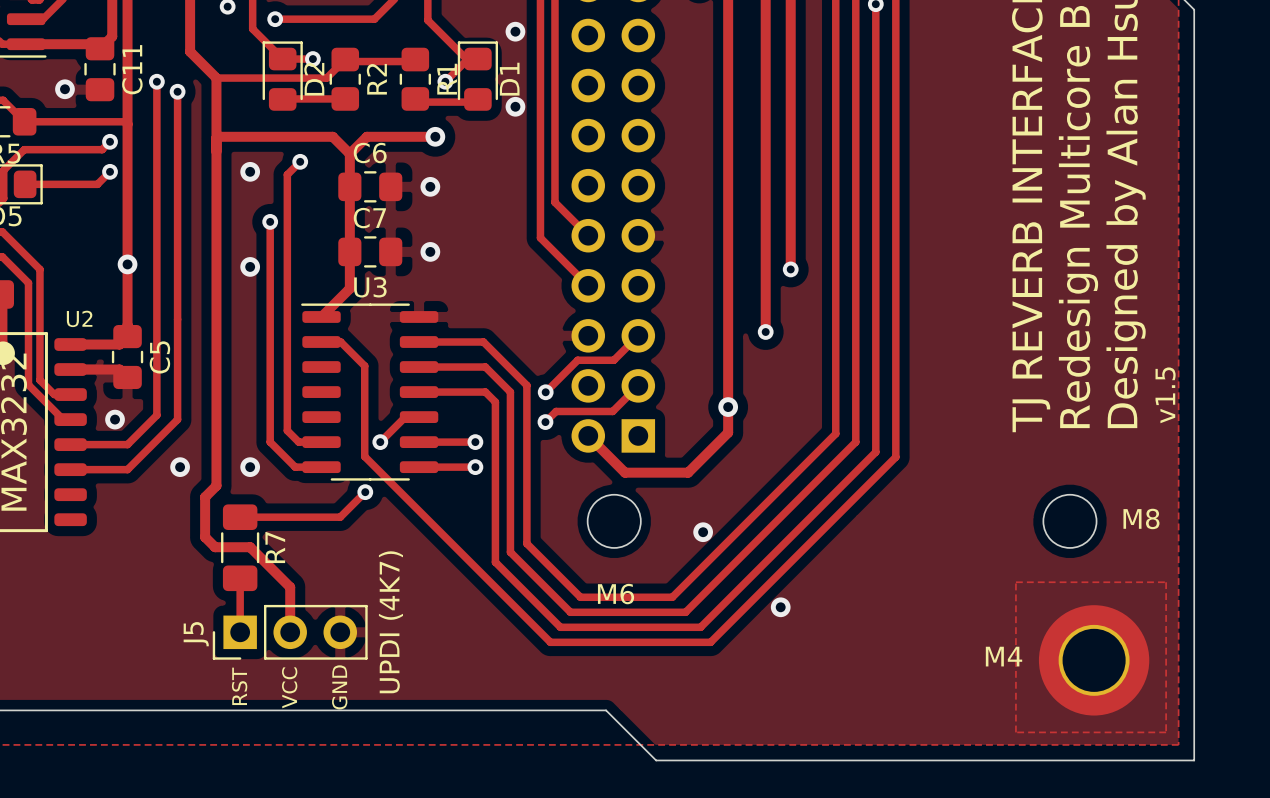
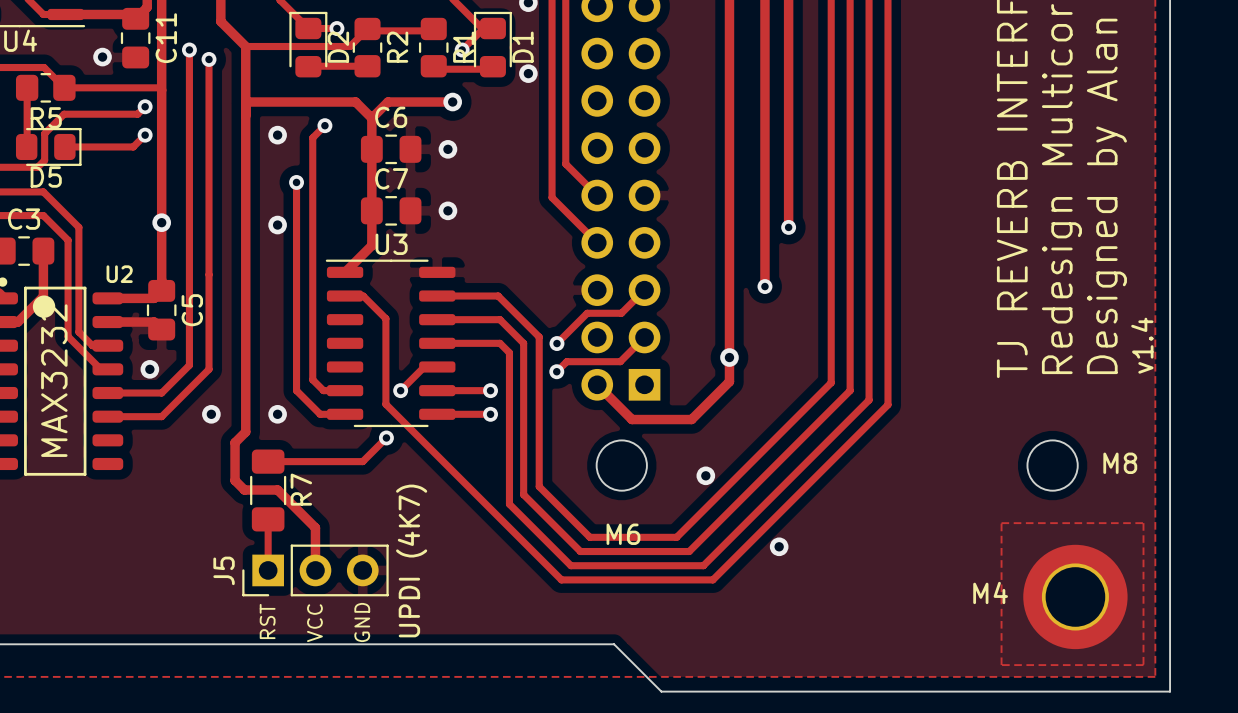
text: v1.5 (1165, 395) -> v1.4 (1142, 345)

